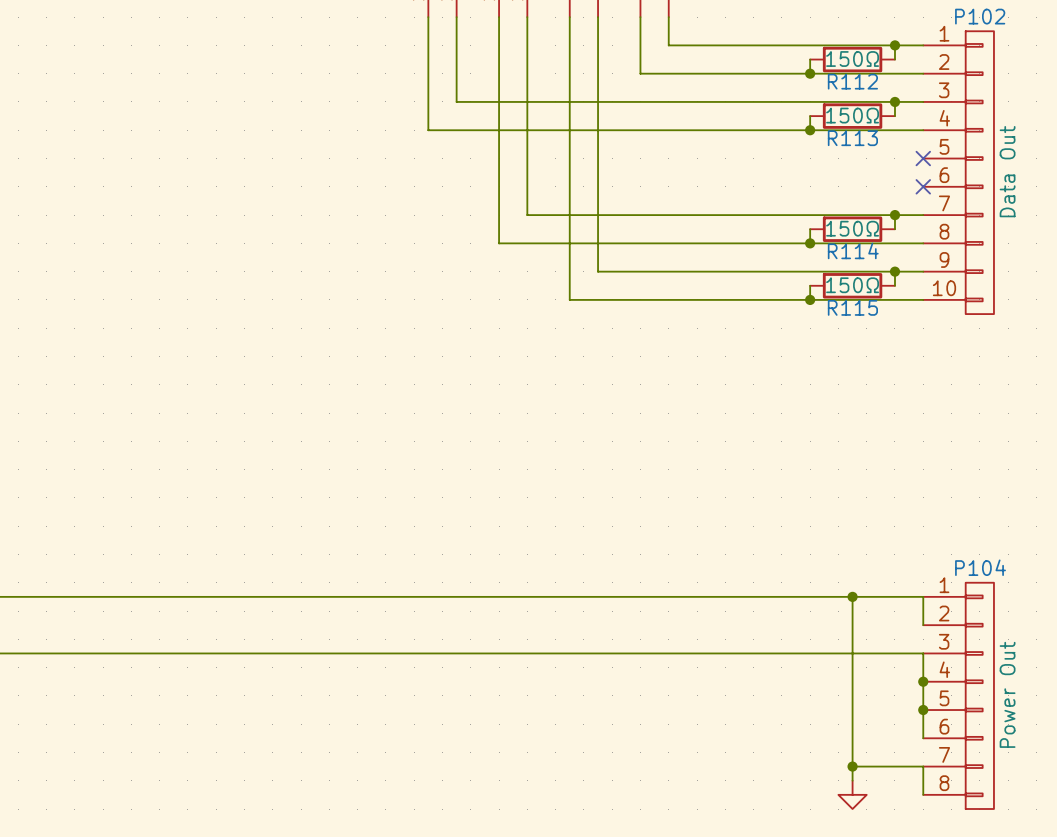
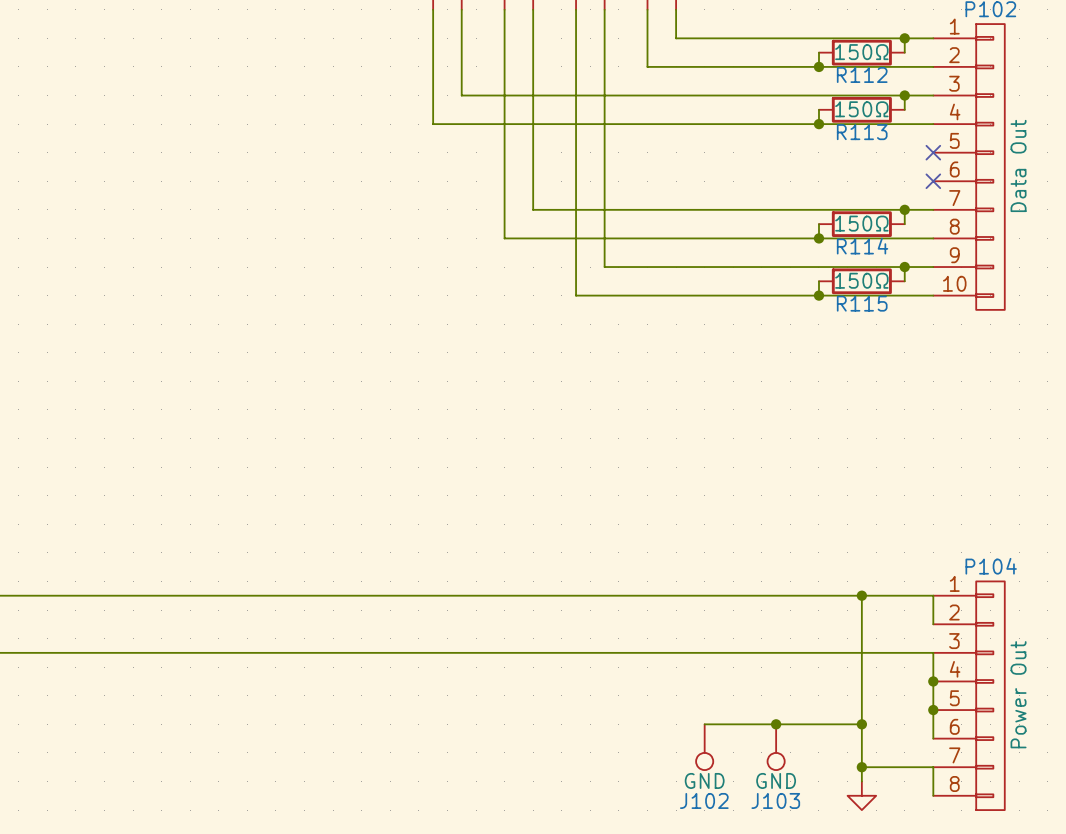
wire: none -> (704, 724) (861, 724)
junction: none -> (776, 724)
junction: none -> (861, 724)
J102: none -> GND (704, 747)
J103: none -> GND (776, 747)

